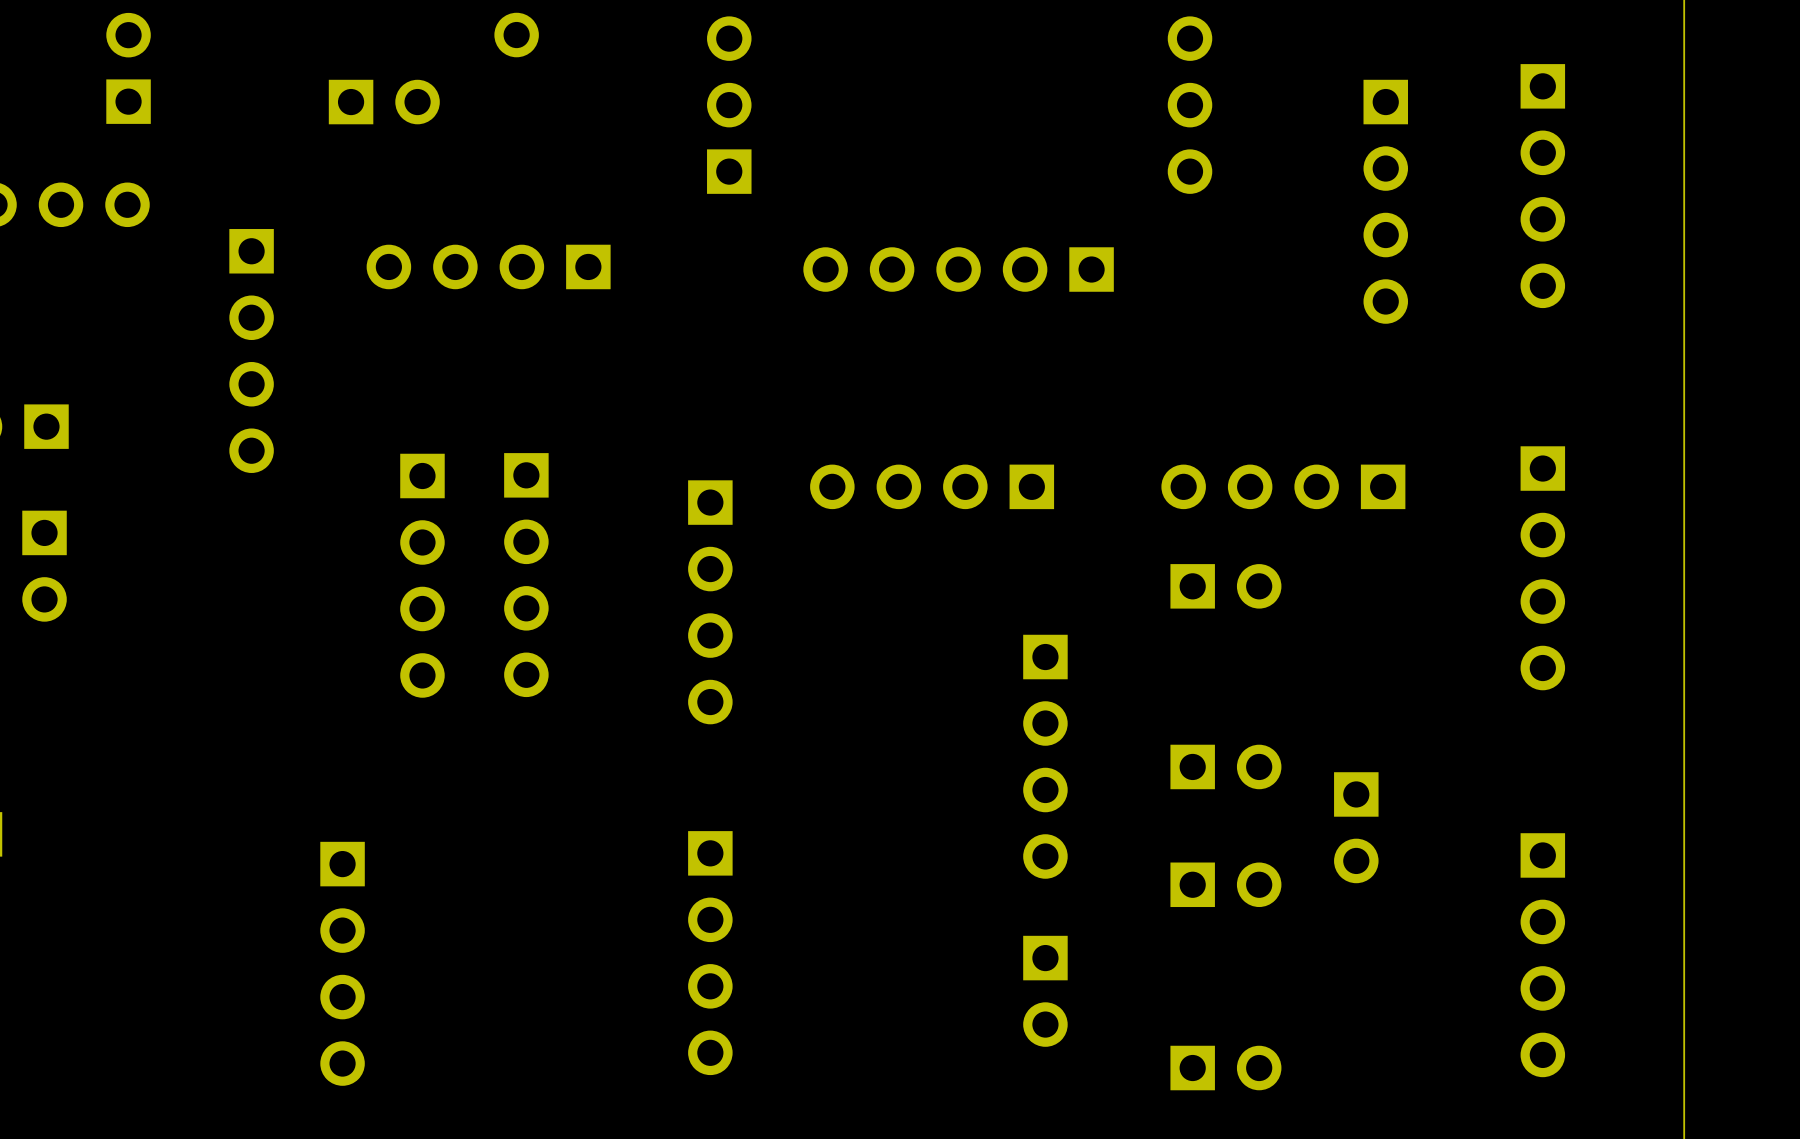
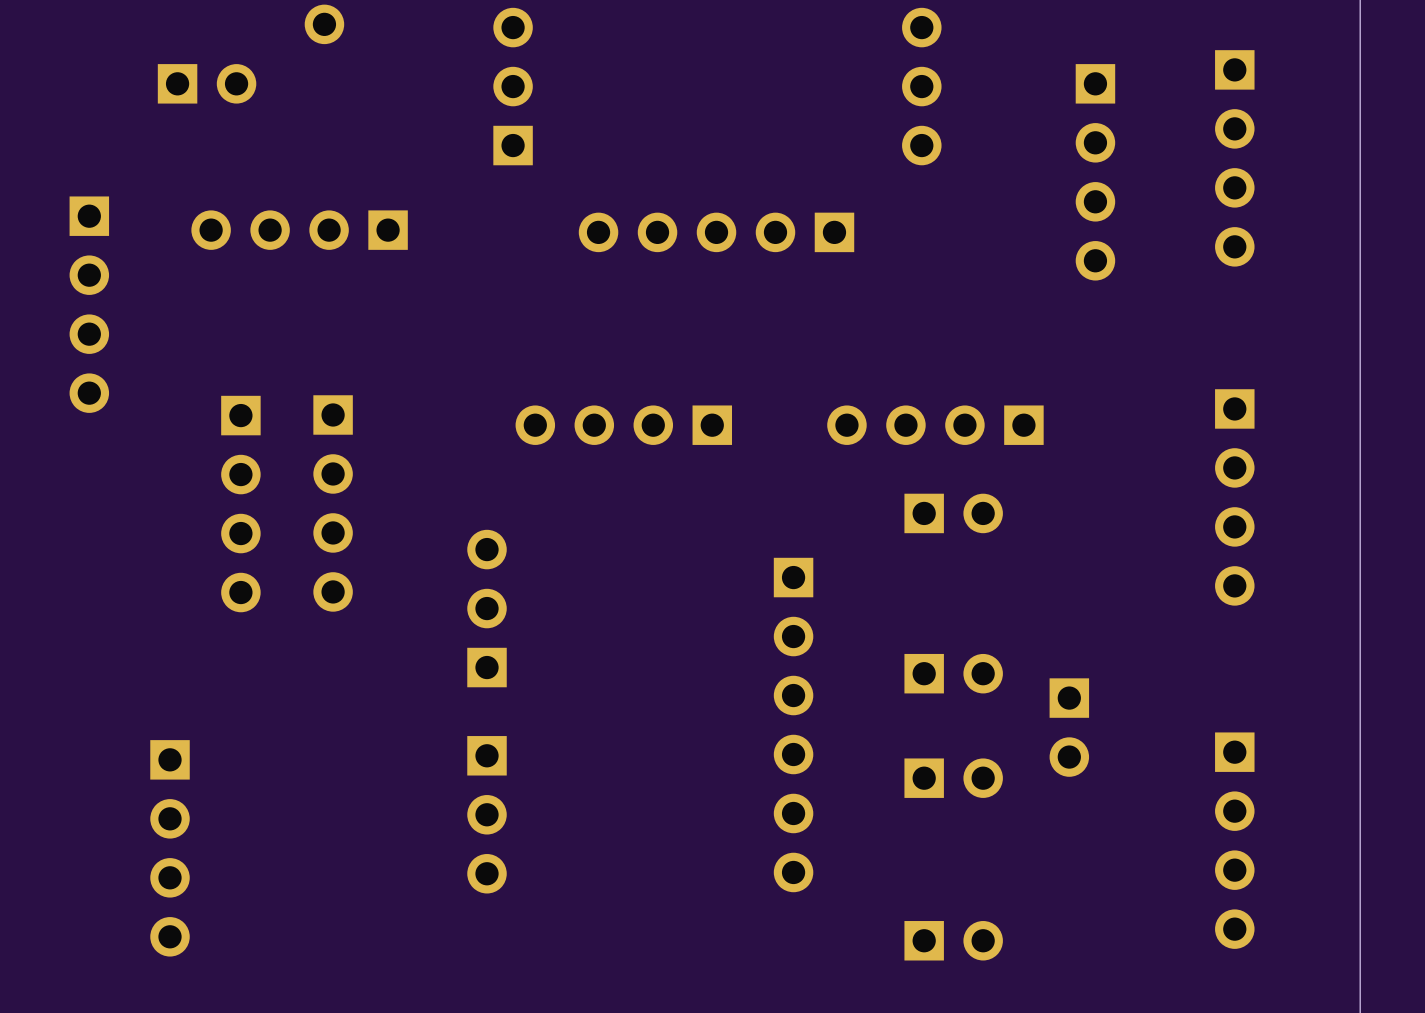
part position: (932, 486) -> (623, 425)
part position: (1283, 486) -> (935, 425)
part: (710, 602) -> none
part: none -> (487, 608)
part: (1045, 756) -> none
part: none -> (793, 725)
part: none -> (487, 814)
part: (710, 953) -> none
part: (1045, 991) -> none

